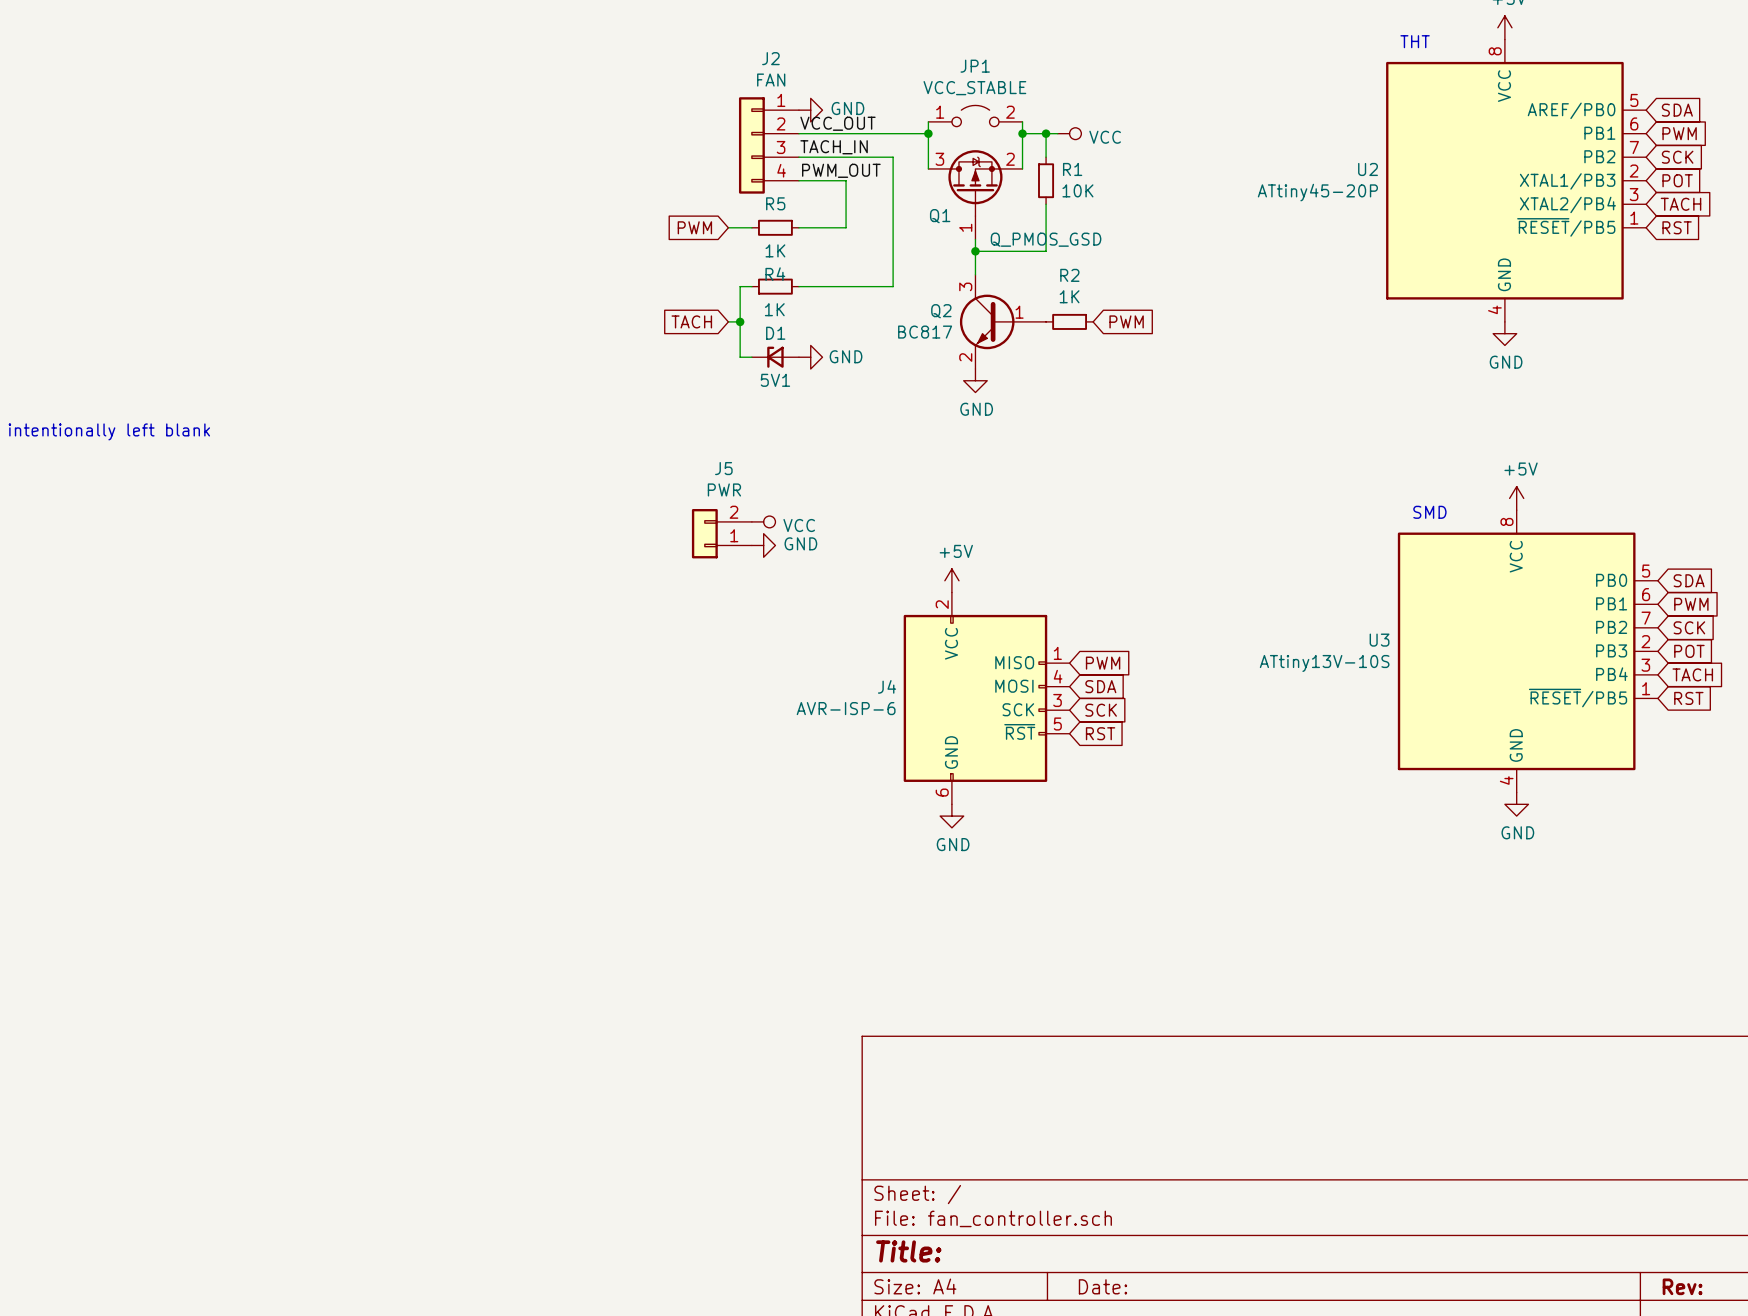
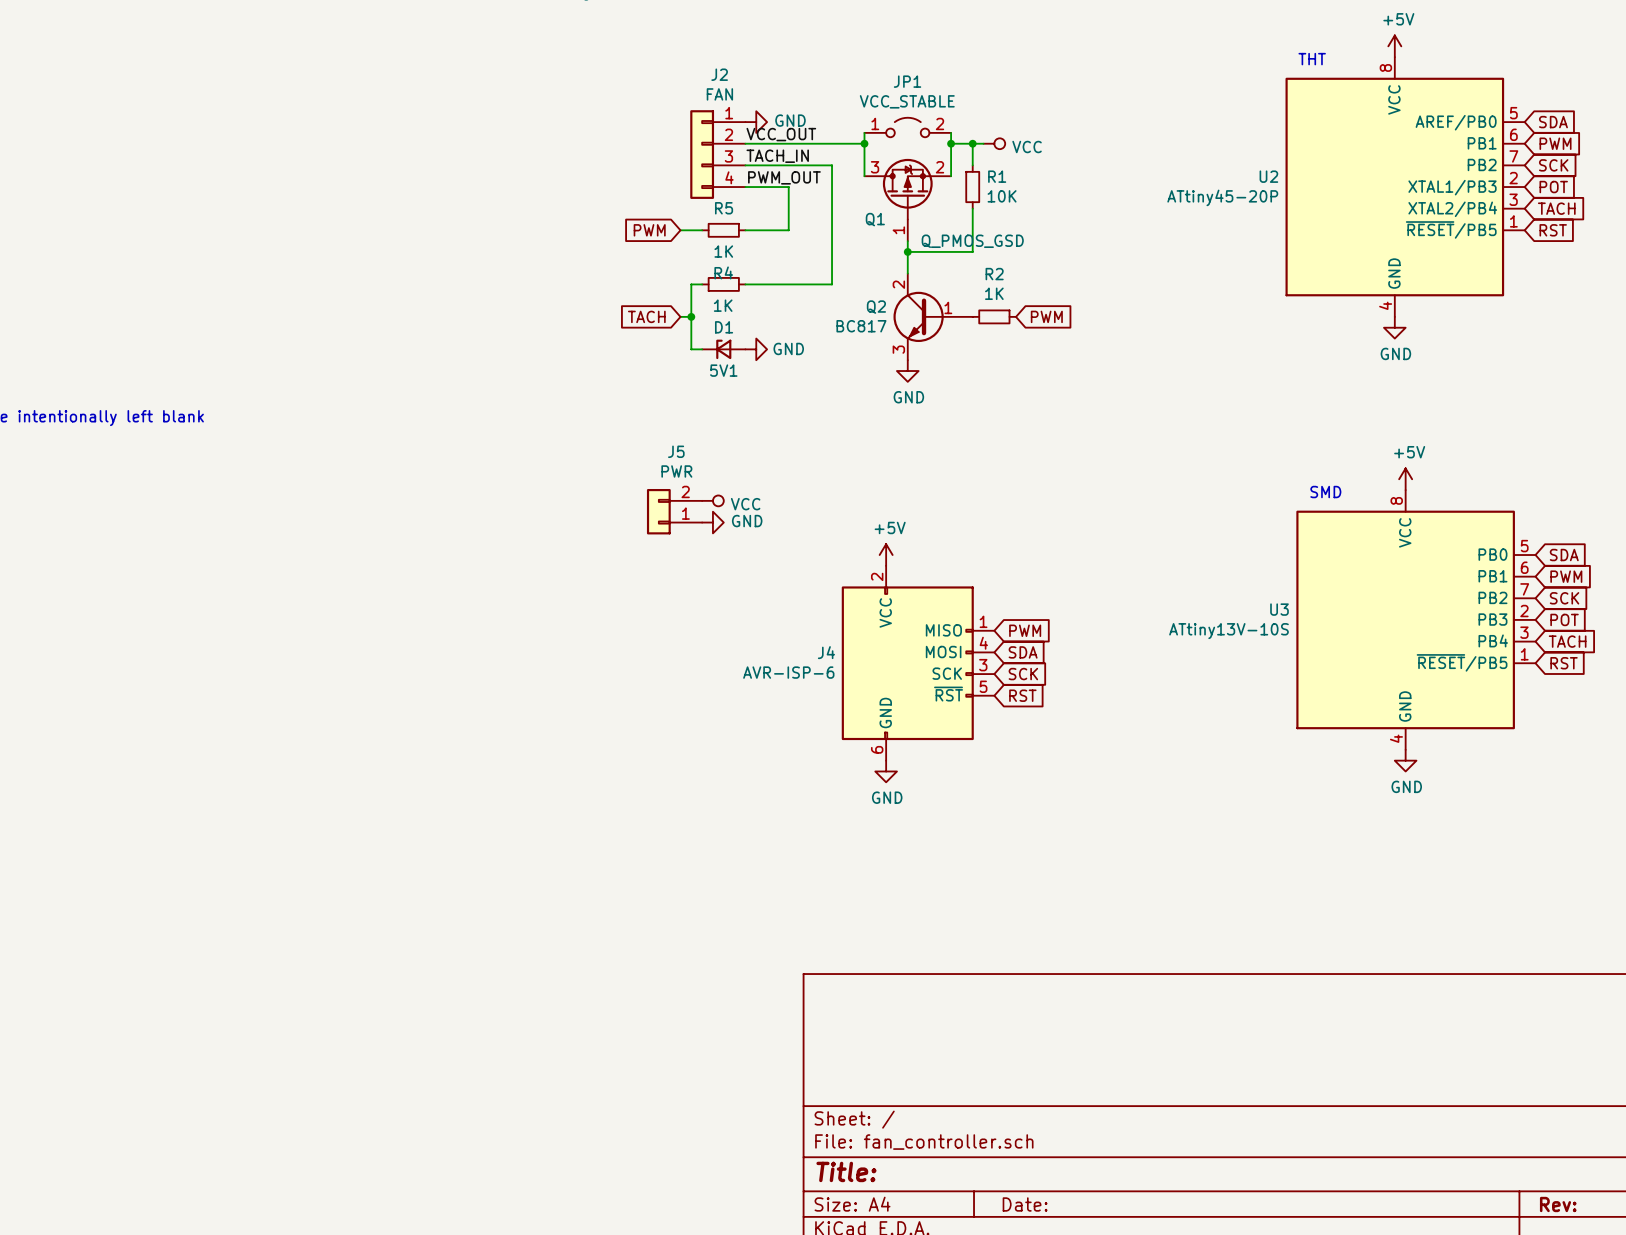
Q2 pin number: 3 (965, 286) -> 2 (898, 284)
Q2 pin number: 2 (965, 357) -> 3 (898, 349)

